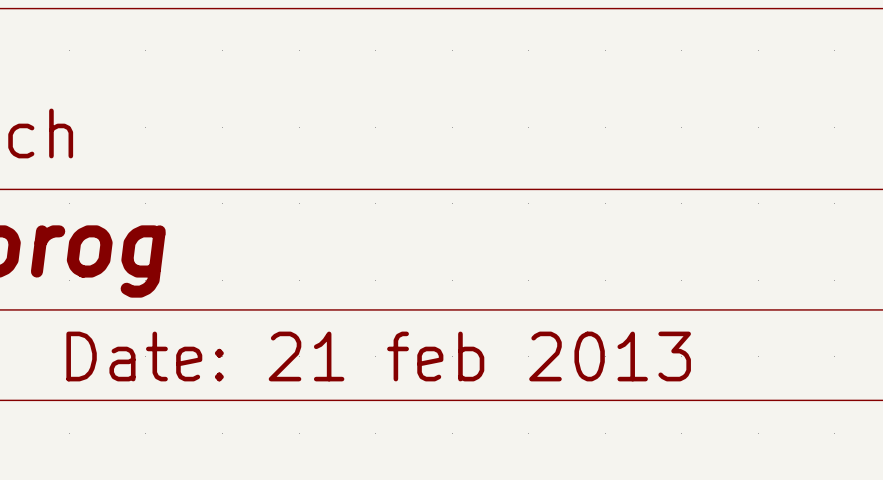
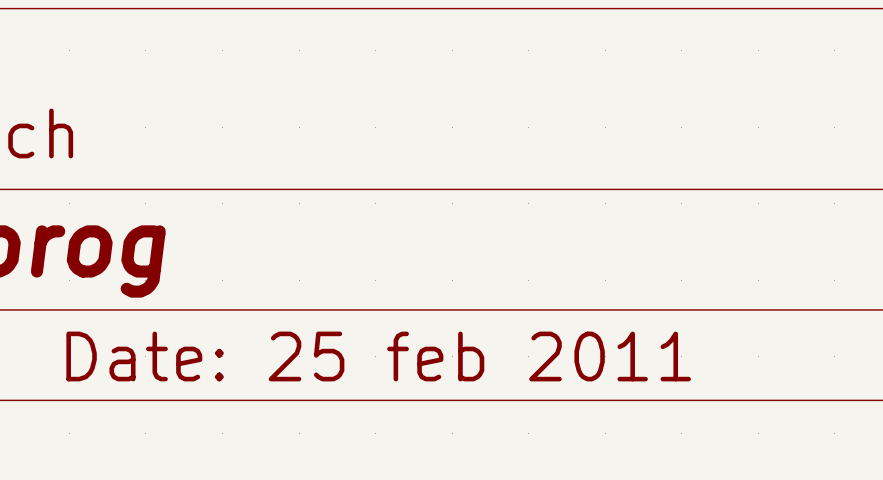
title block: Date: 21 feb 2013 (378, 356) -> Date: 25 feb 2011 (378, 356)

